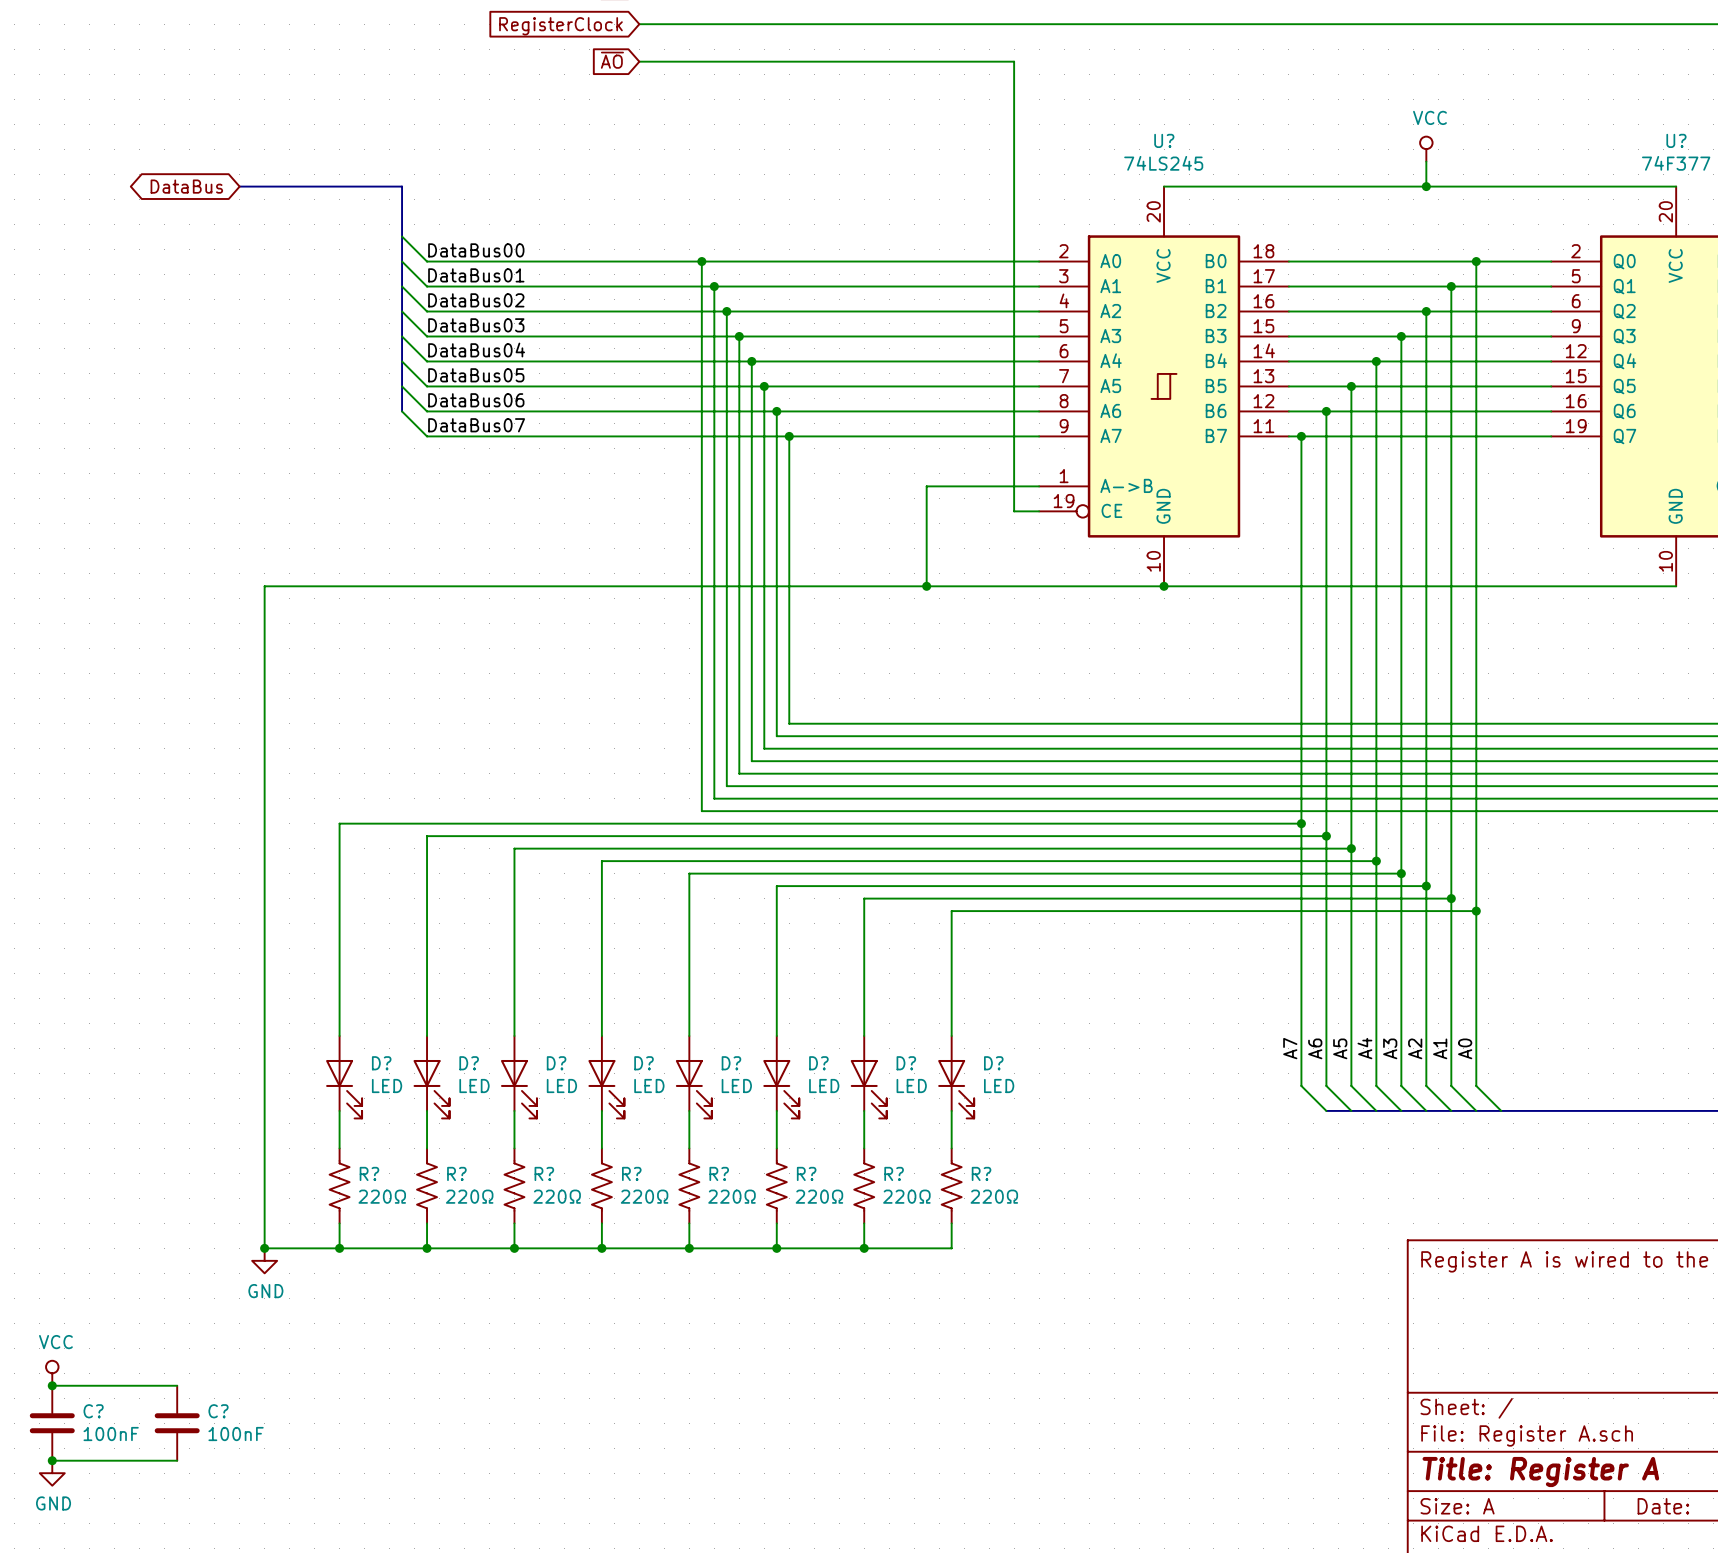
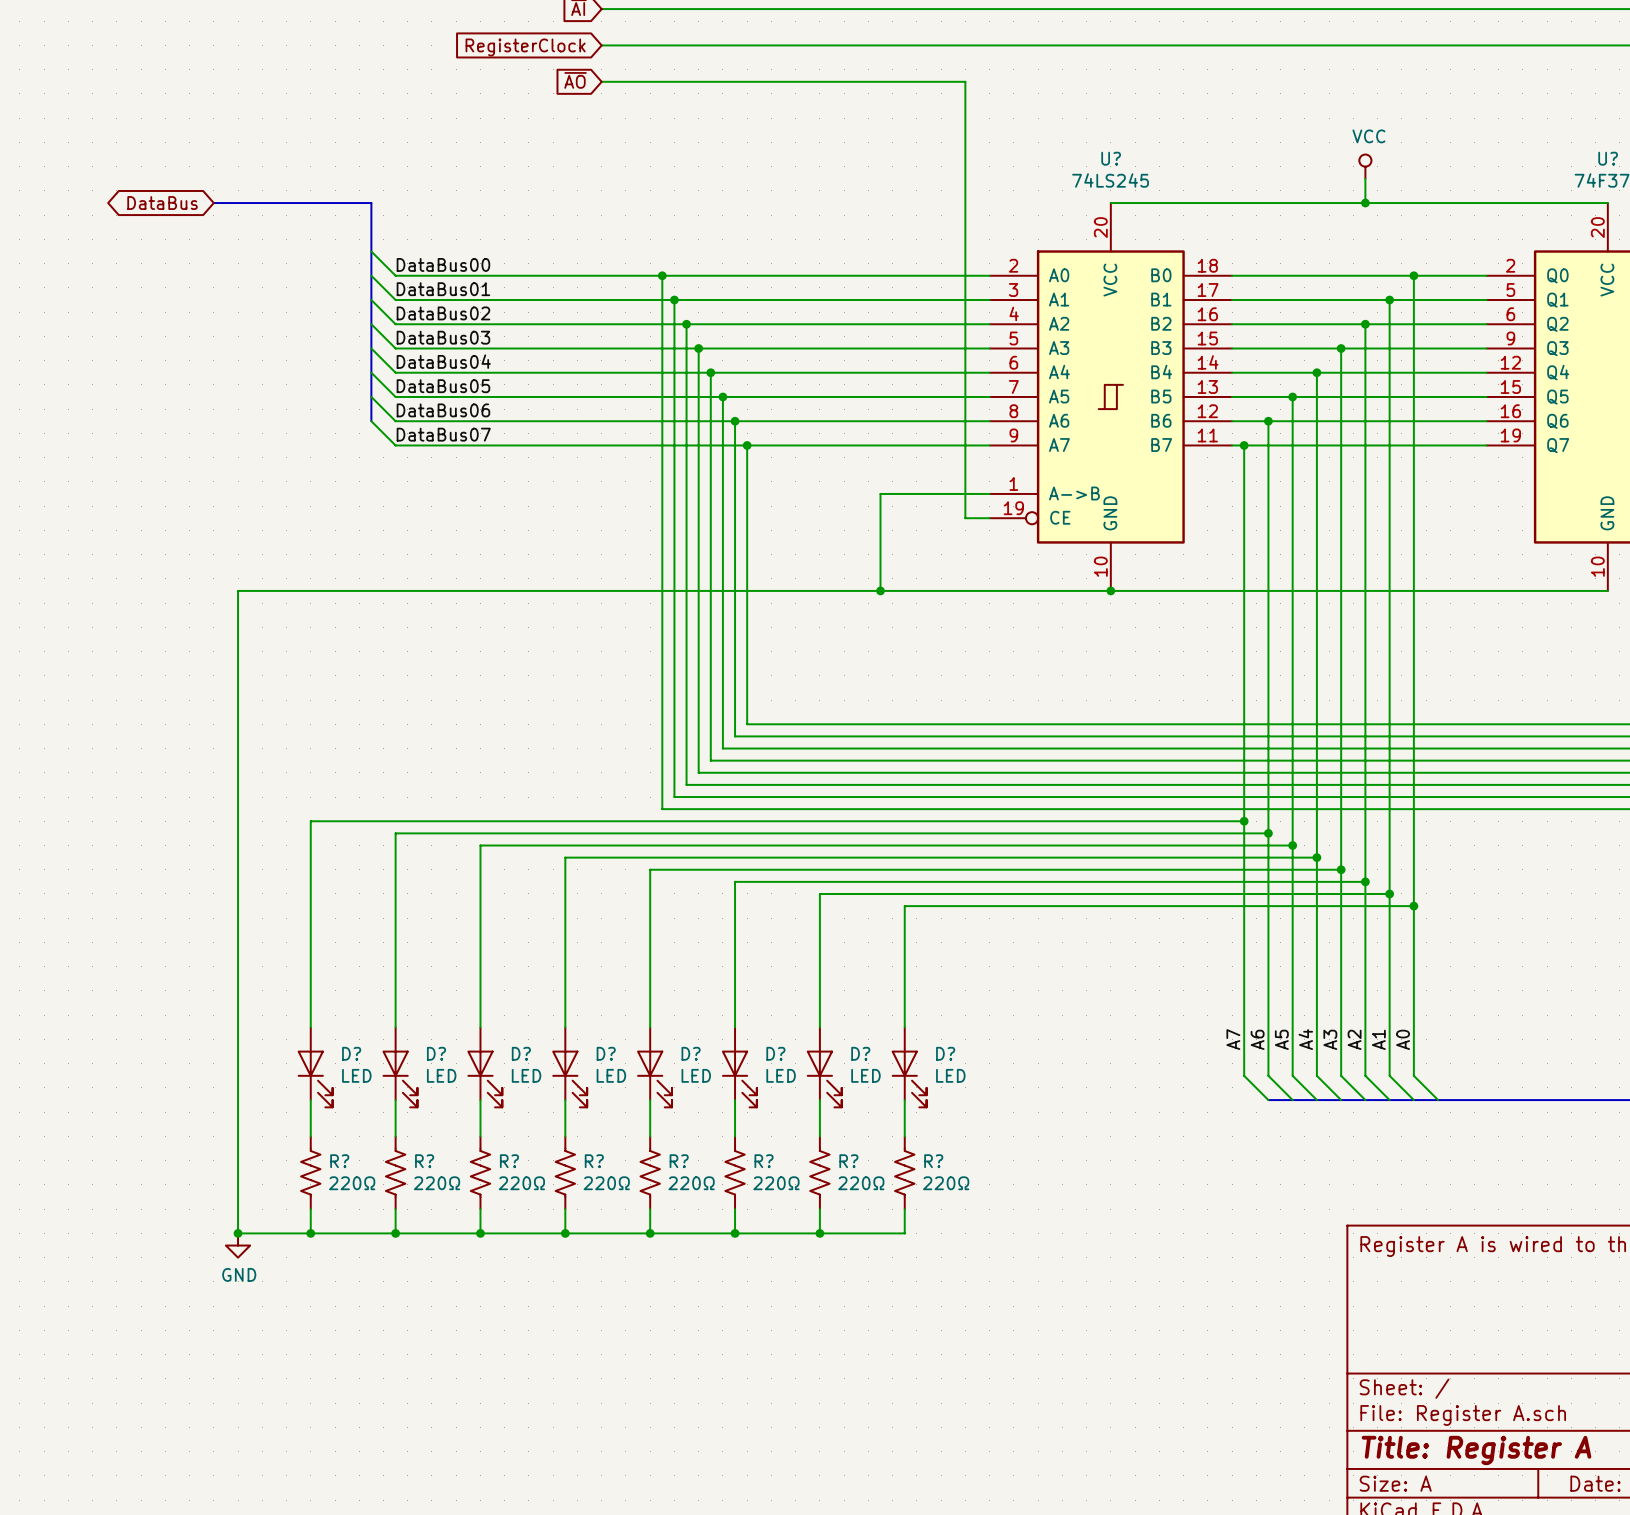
power symbol: VCC (52, 1373) -> none
wire: (52, 1385) (177, 1385) -> none
junction: (52, 1385) -> none
C?: 100nF (52, 1423) -> none
C?: 100nF (177, 1423) -> none
wire: (52, 1460) (177, 1460) -> none
junction: (52, 1460) -> none
power symbol: GND (52, 1473) -> none

